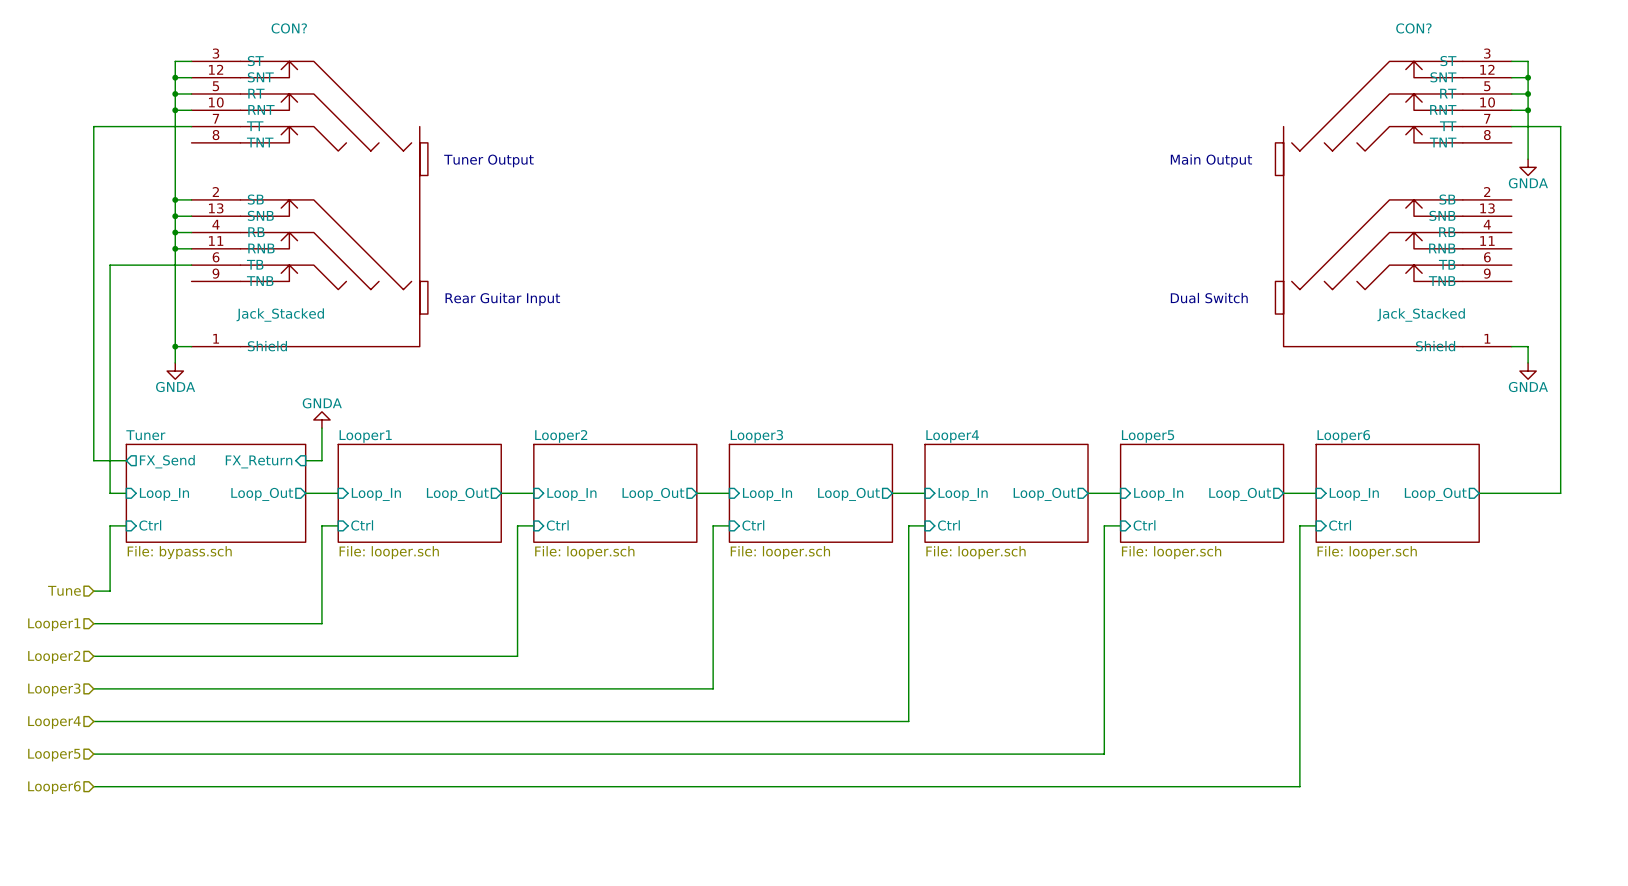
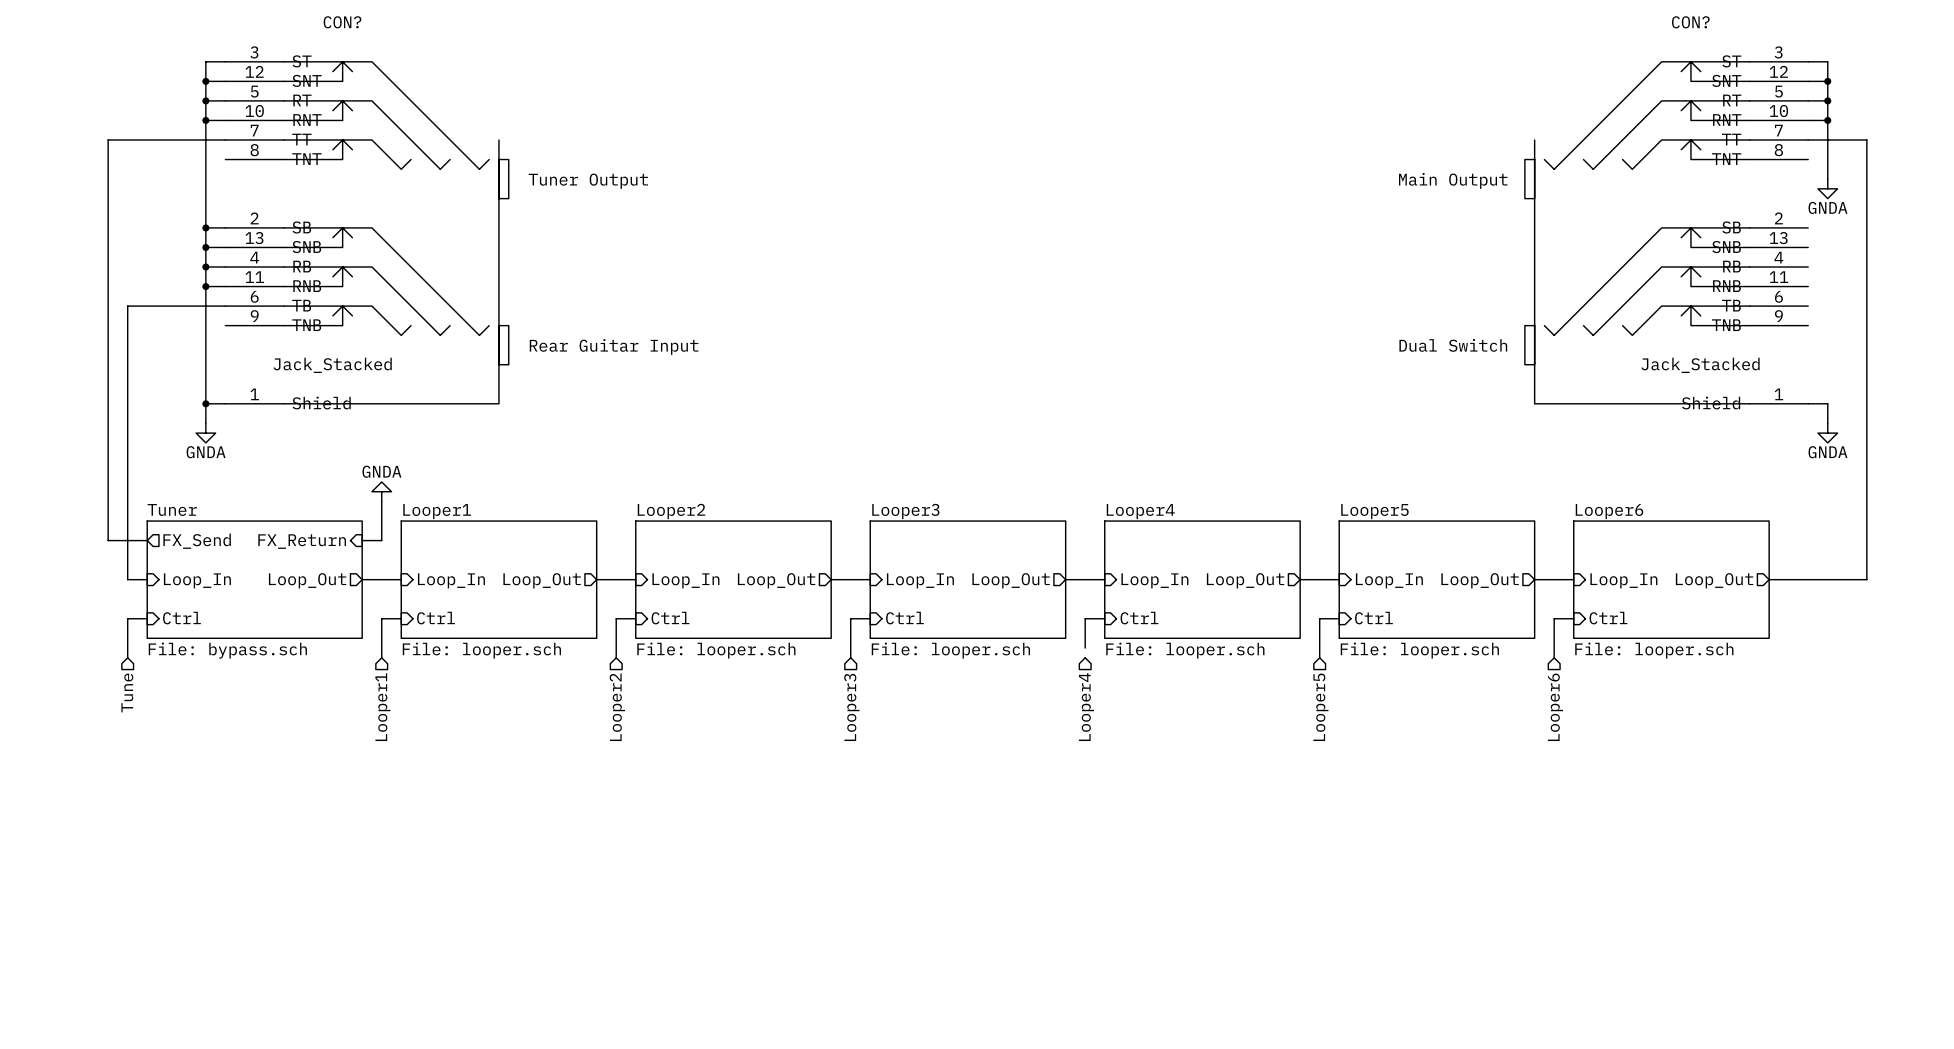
wire: (908, 550) (908, 721) (93, 721) -> none
wire: (110, 558) (110, 591) (93, 591) -> none
wire: (321, 558) (321, 623) (93, 623) -> none
wire: (517, 558) (517, 656) (93, 656) -> none
wire: (713, 558) (713, 688) (93, 688) -> none
wire: (1104, 558) (1104, 754) (93, 754) -> none
wire: (1299, 558) (1299, 786) (93, 786) -> none
hierarchical label rotation: 0° (64, 590) -> 90° counterclockwise (127, 692)
hierarchical label position: Tune (64, 590) -> Tune (127, 692)
hierarchical label: none -> Looper3 (851, 707)
hierarchical label: none -> Looper4 (1086, 707)
hierarchical label: none -> Looper6 (1555, 707)
hierarchical label: none -> Looper1 (382, 707)
hierarchical label: none -> Looper2 (617, 707)
hierarchical label: none -> Looper5 (1320, 707)
hierarchical label: Looper1 (54, 624) -> none
hierarchical label: Looper2 (54, 657) -> none
hierarchical label: Looper3 (54, 689) -> none
hierarchical label: Looper4 (54, 722) -> none
hierarchical label: Looper5 (54, 755) -> none
hierarchical label: Looper6 (54, 787) -> none

